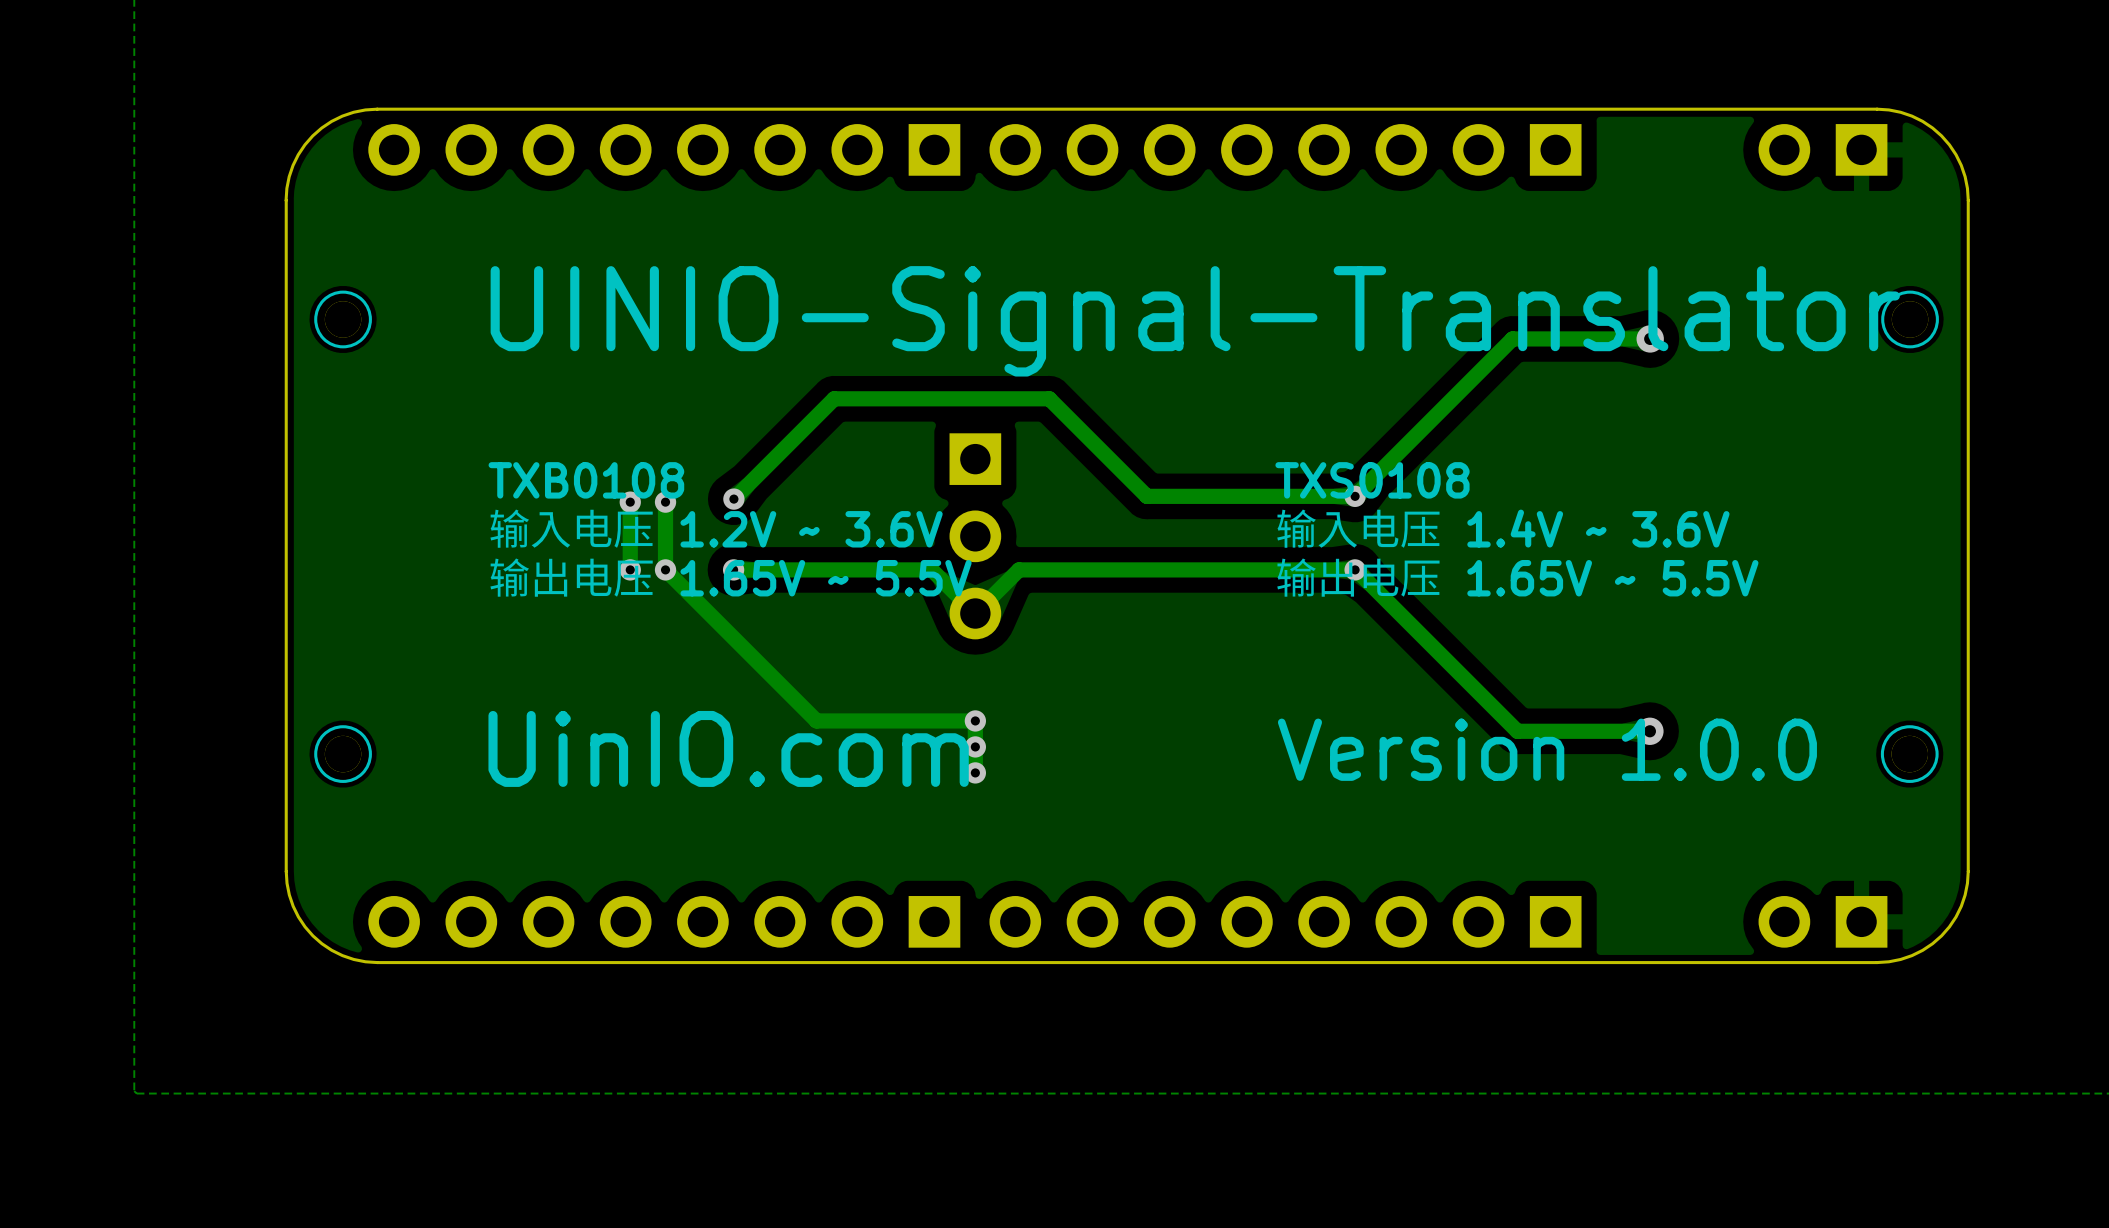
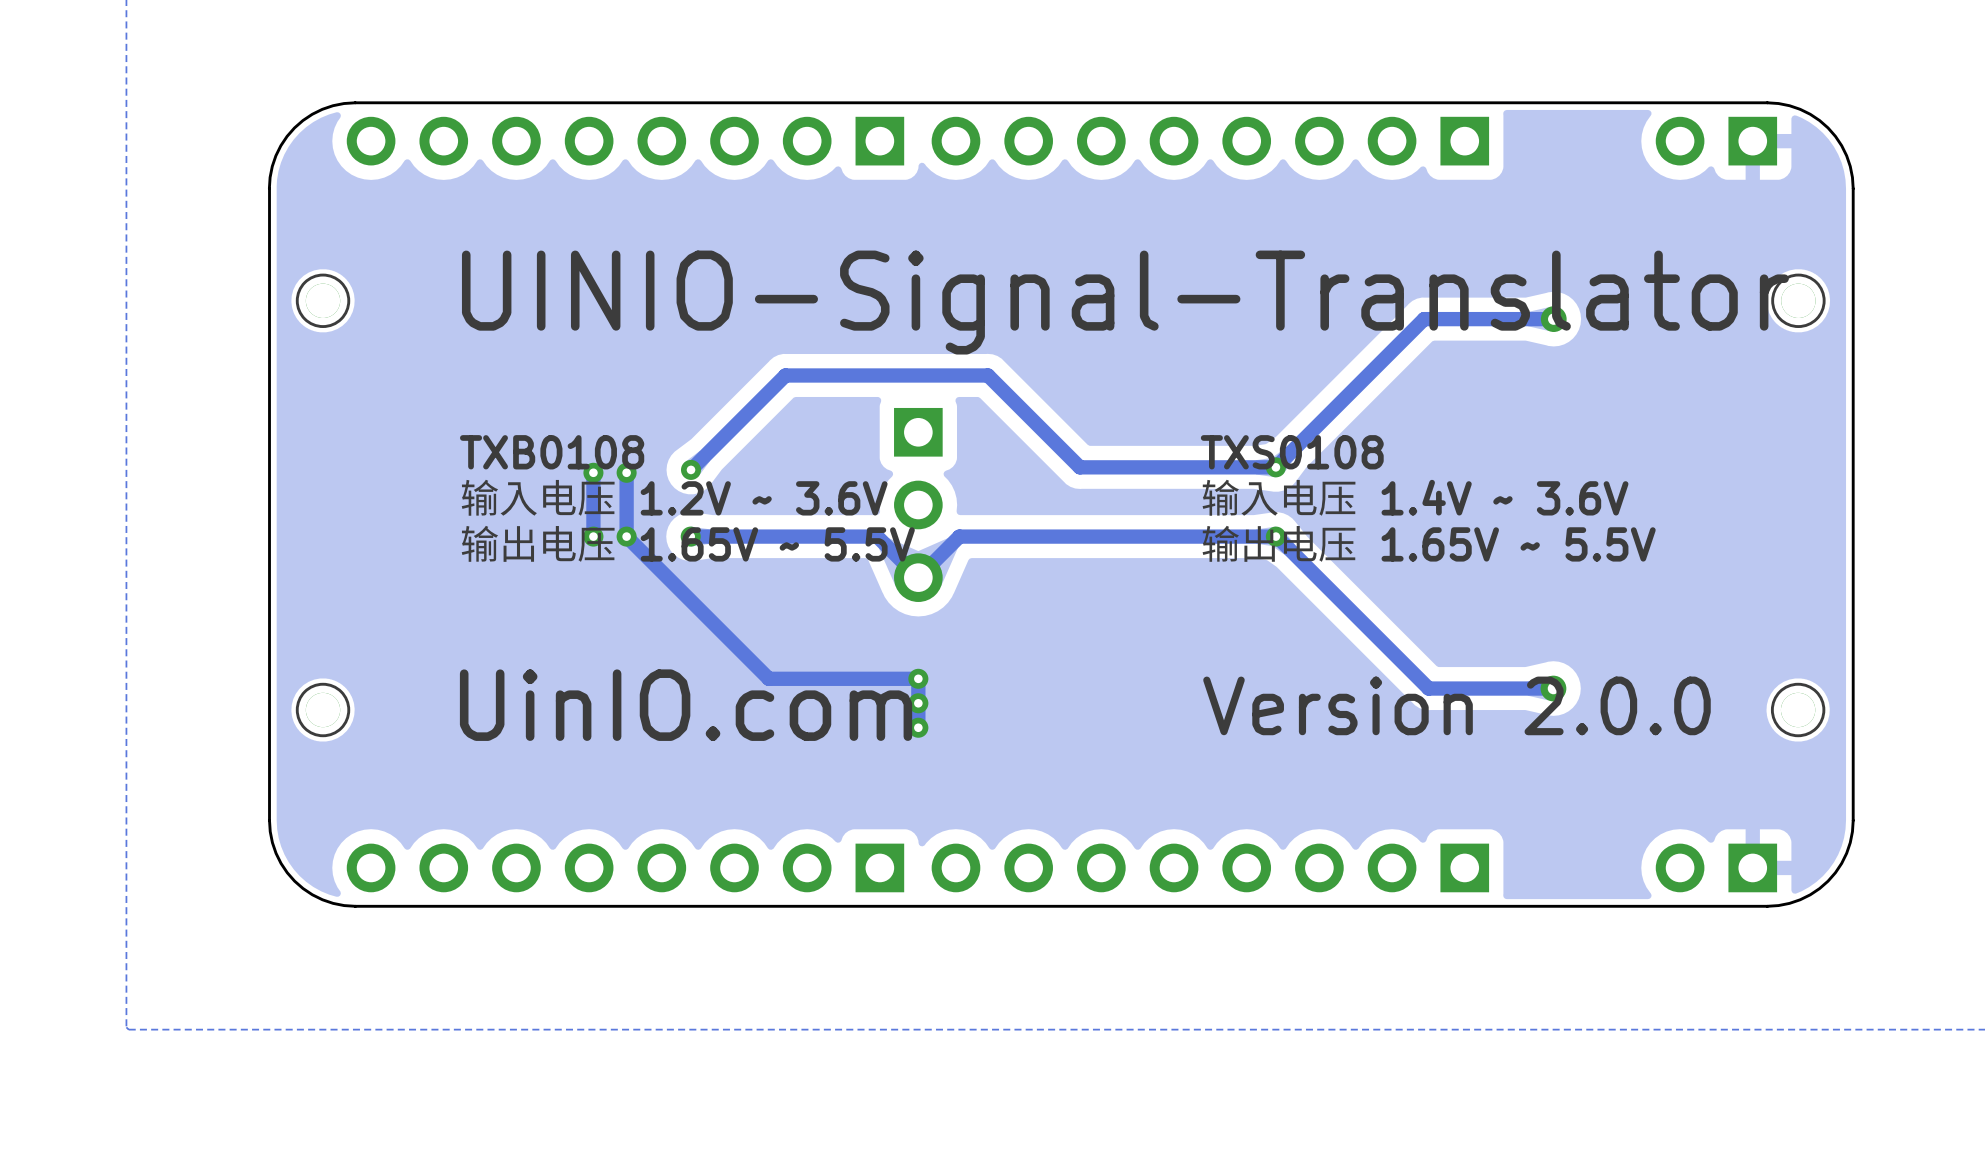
text: Version 1.0.0 (1547, 749) -> Version 2.0.0 (1456, 705)

